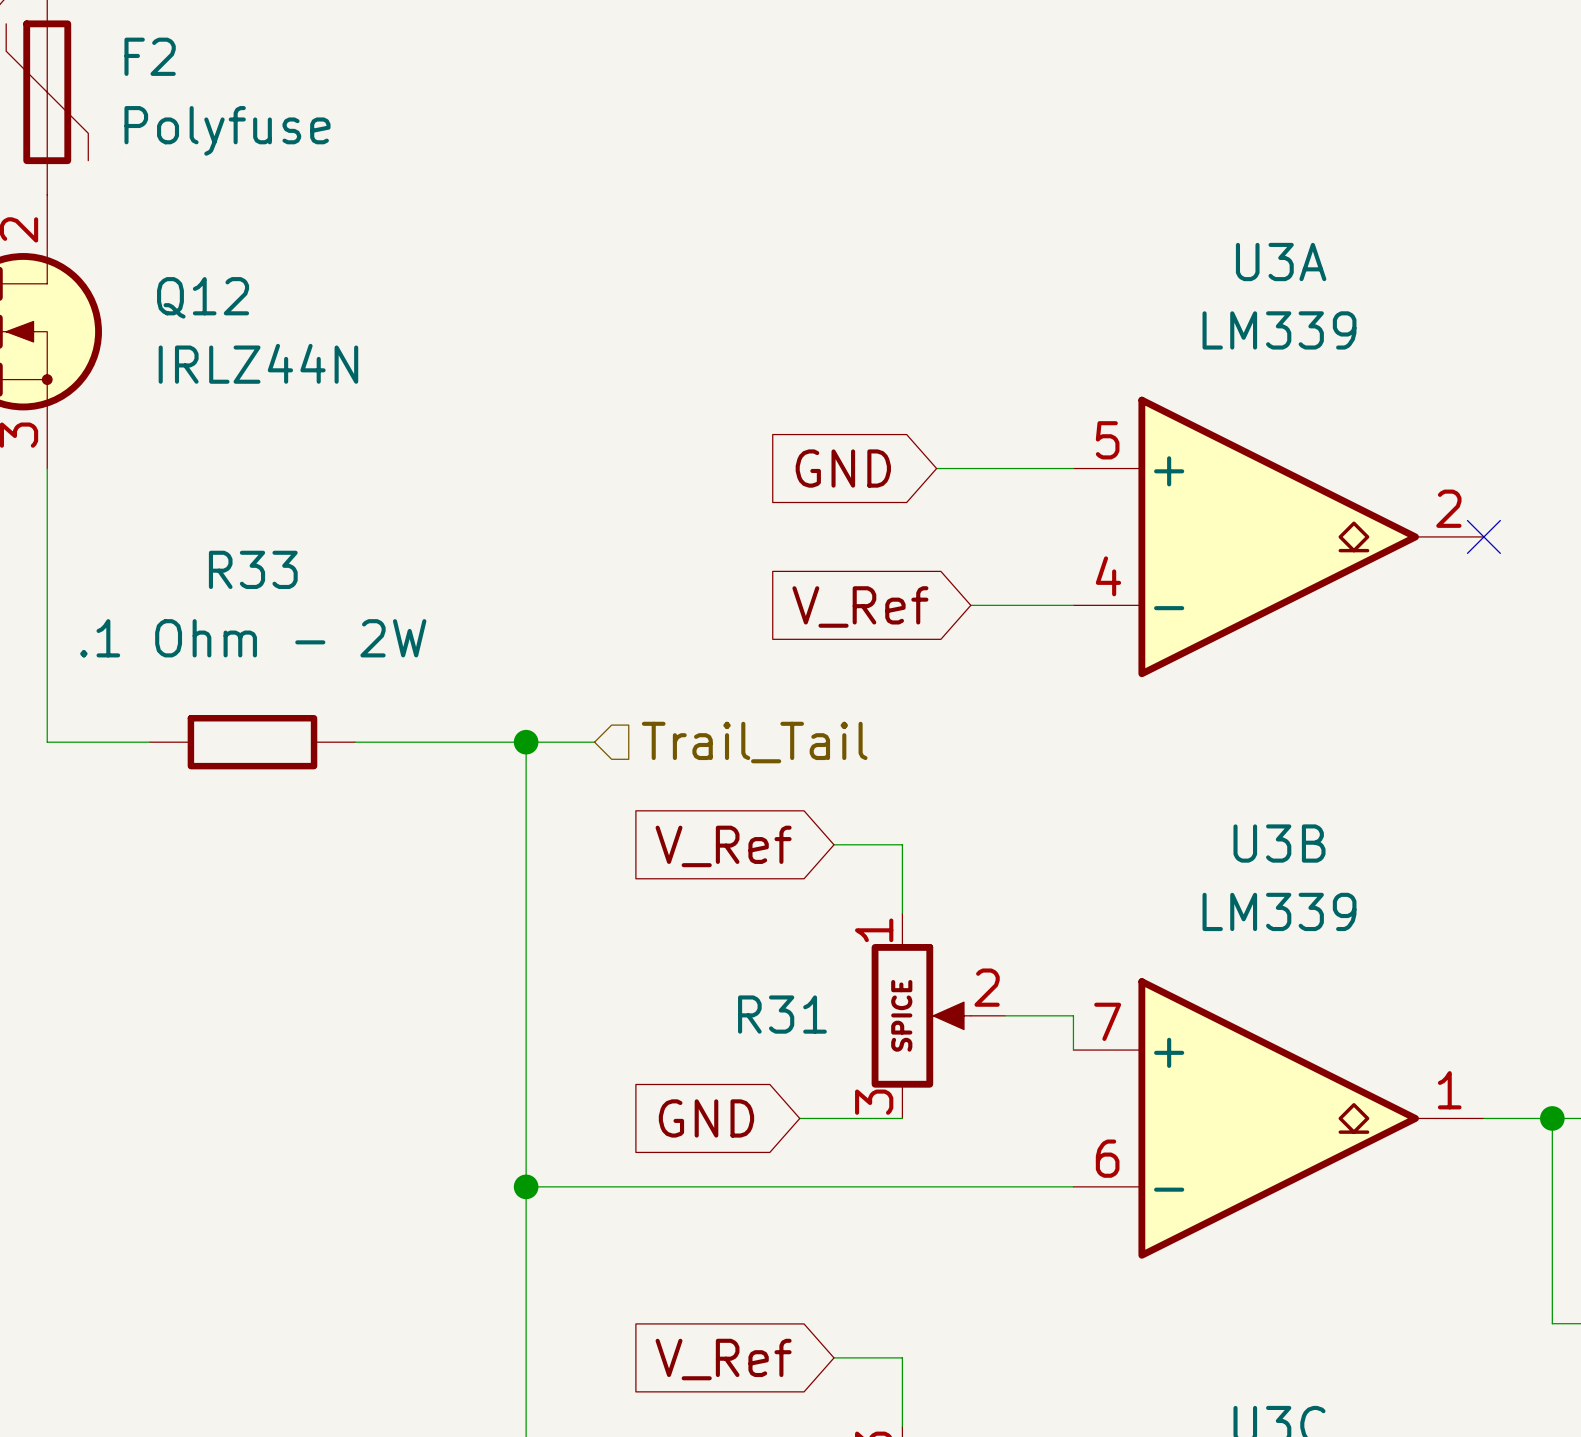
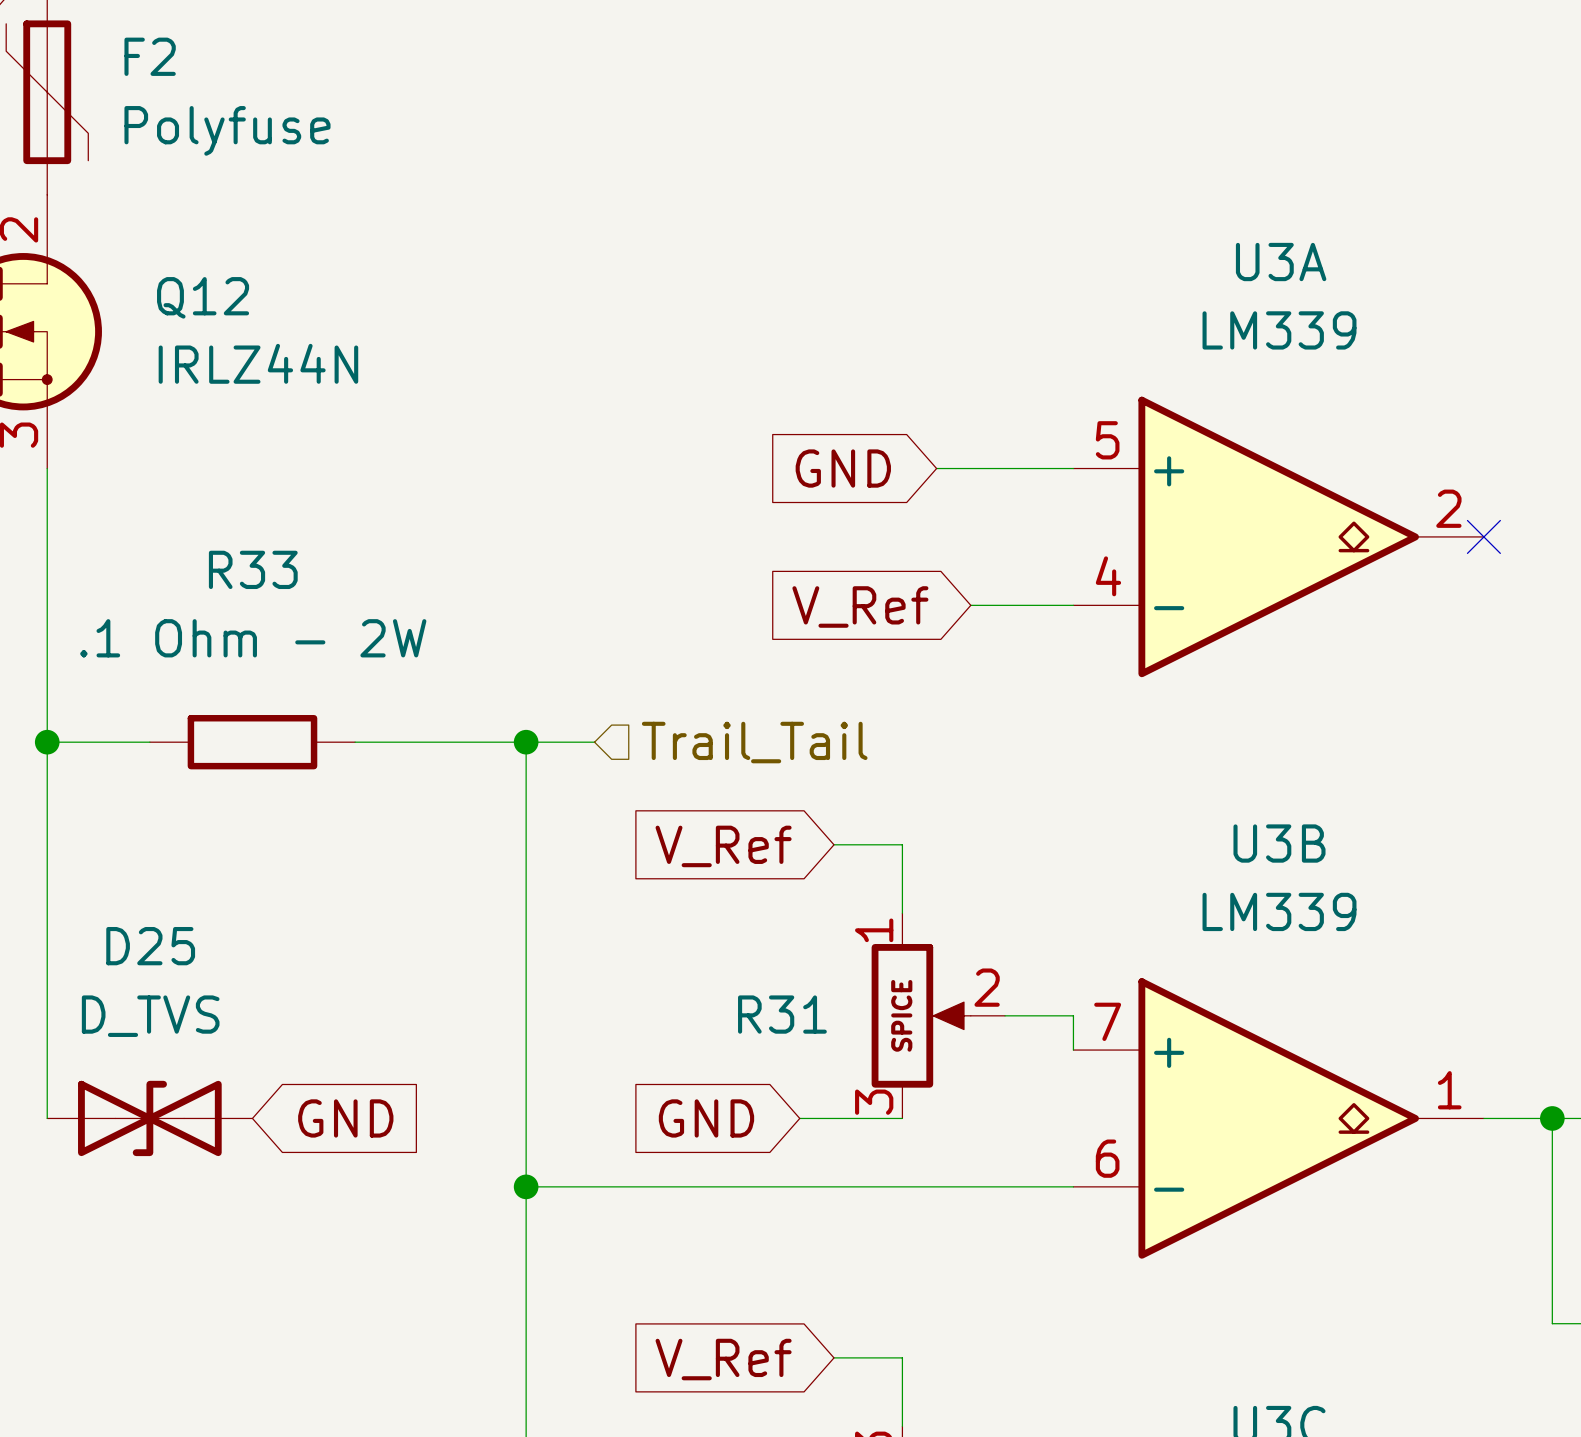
wire: none -> (47, 742) (47, 1118)
junction: none -> (47, 742)
D25: none -> D_TVS (149, 1118)
global label: none -> GND (345, 1118)

